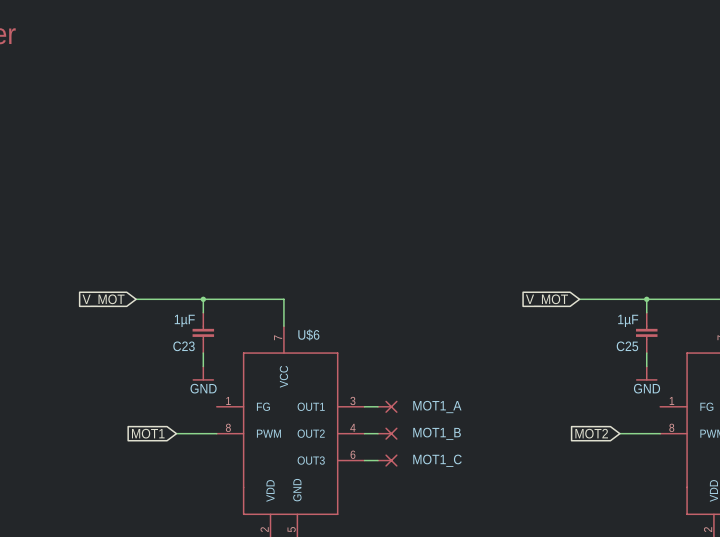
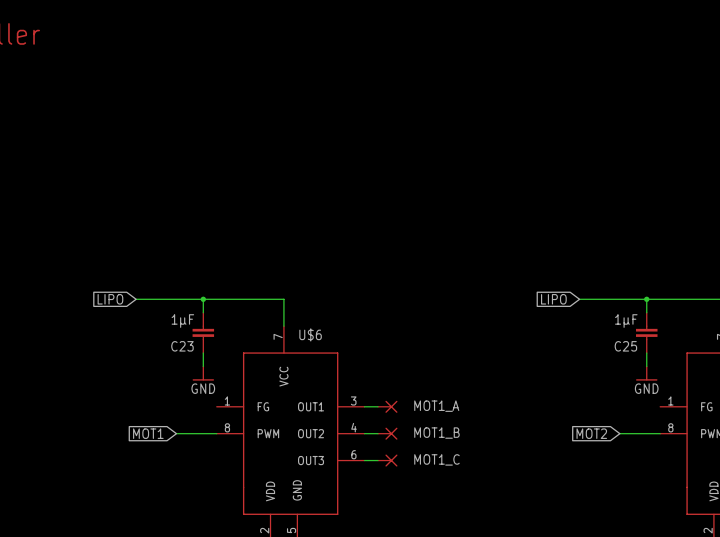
global label: V_MOT (103, 300) -> LIPO (110, 299)
global label: V_MOT (546, 300) -> LIPO (553, 299)

